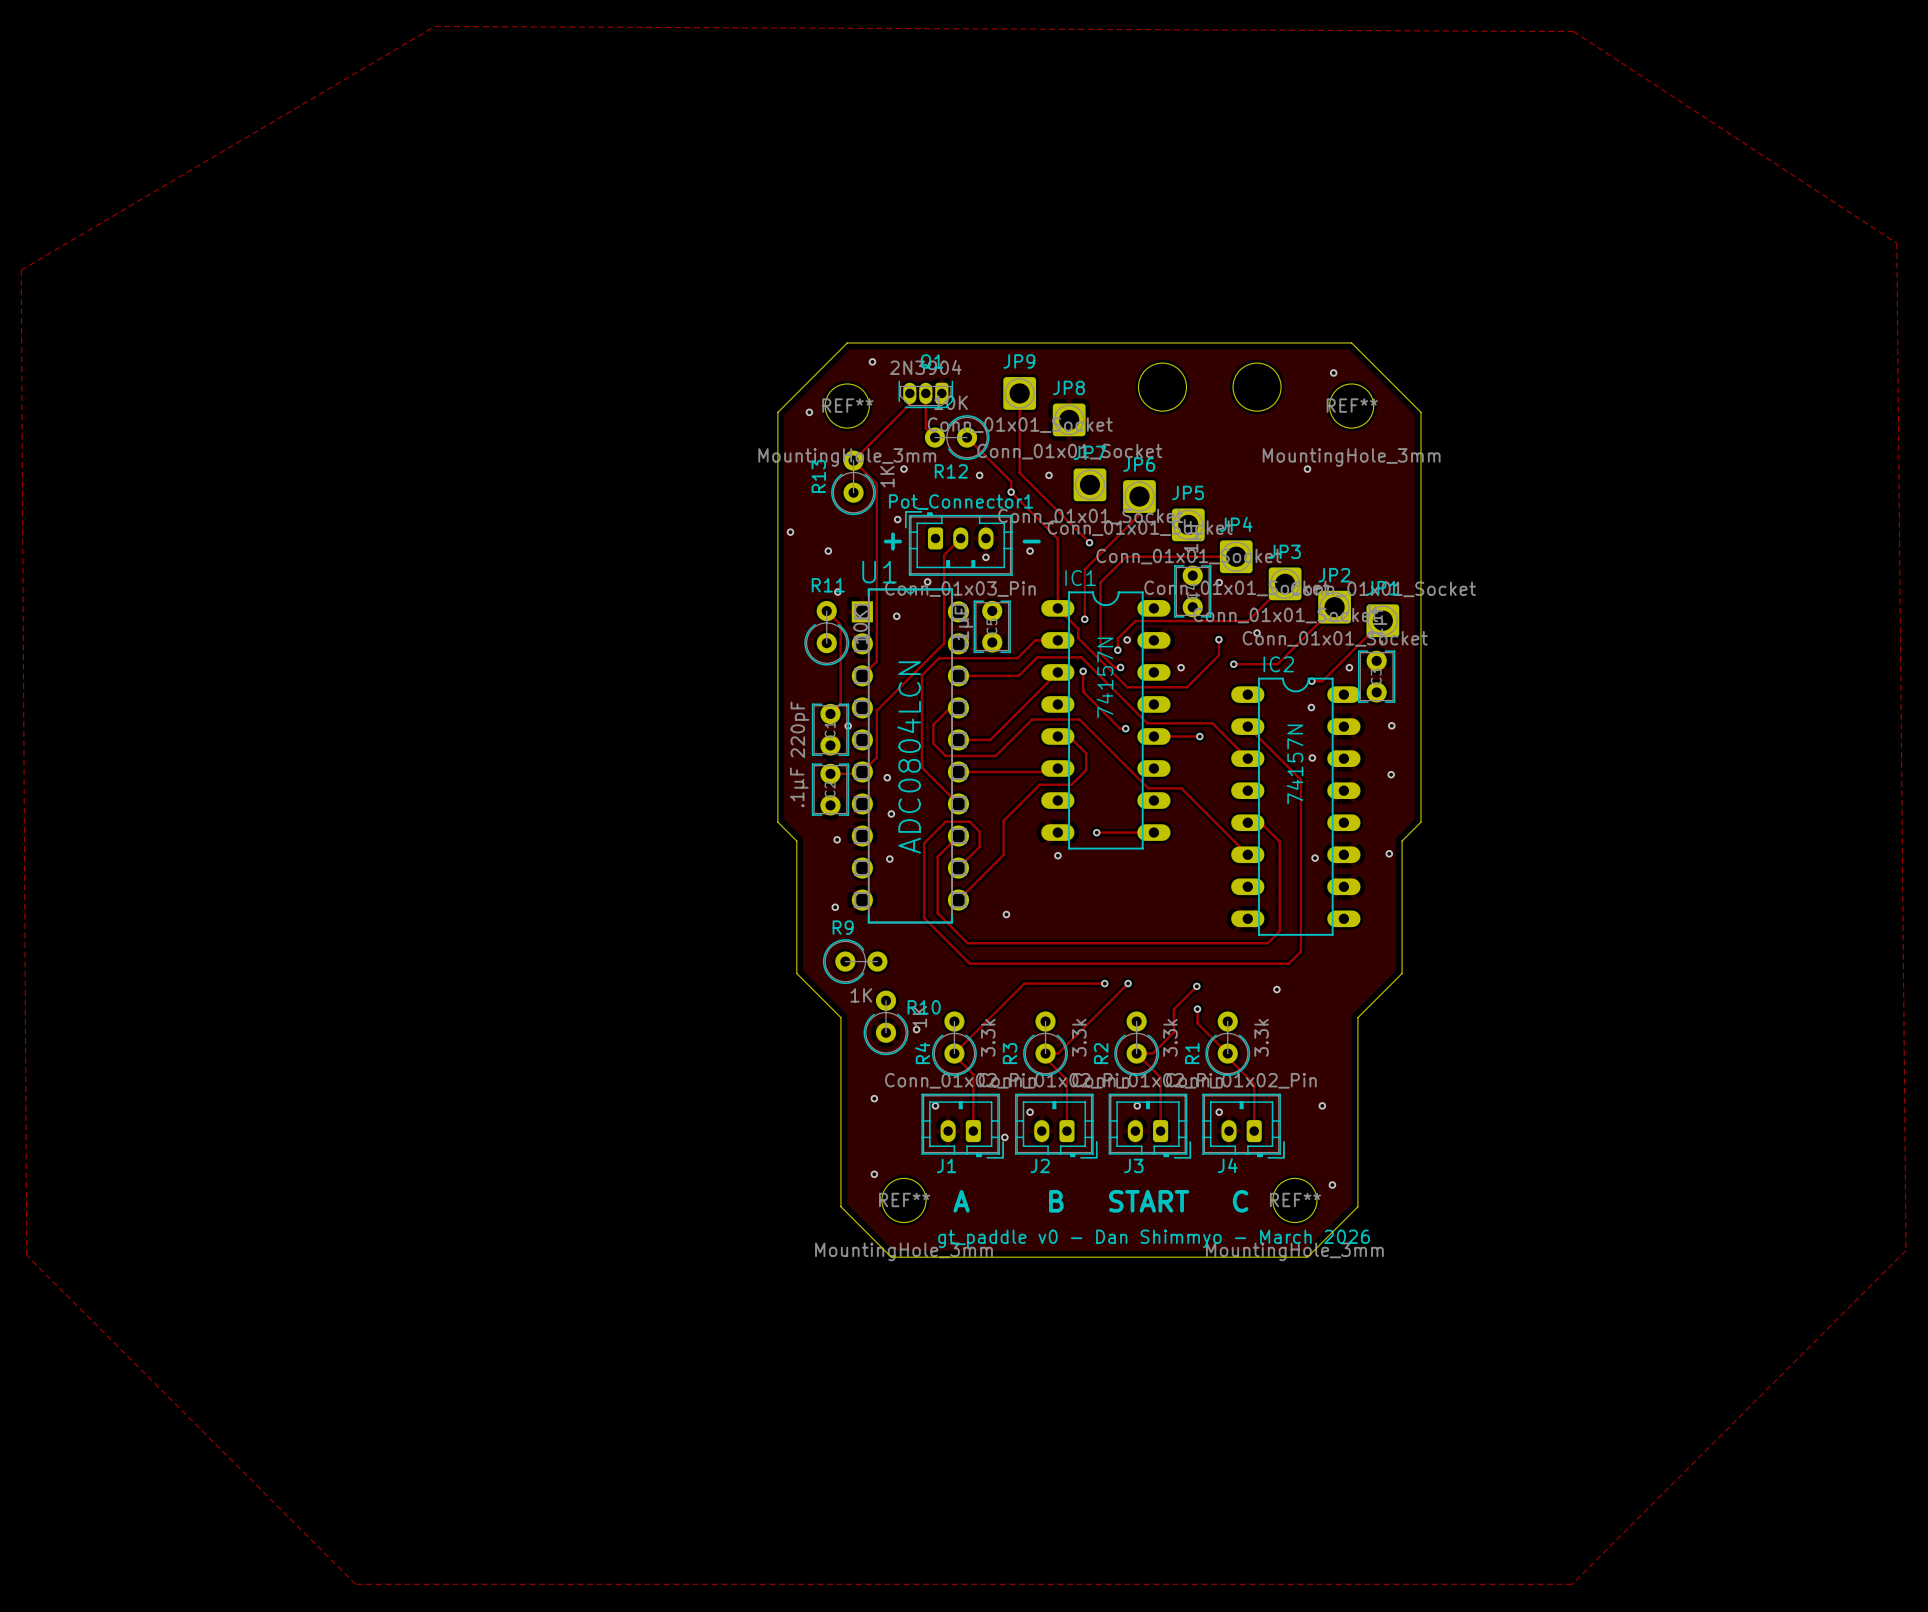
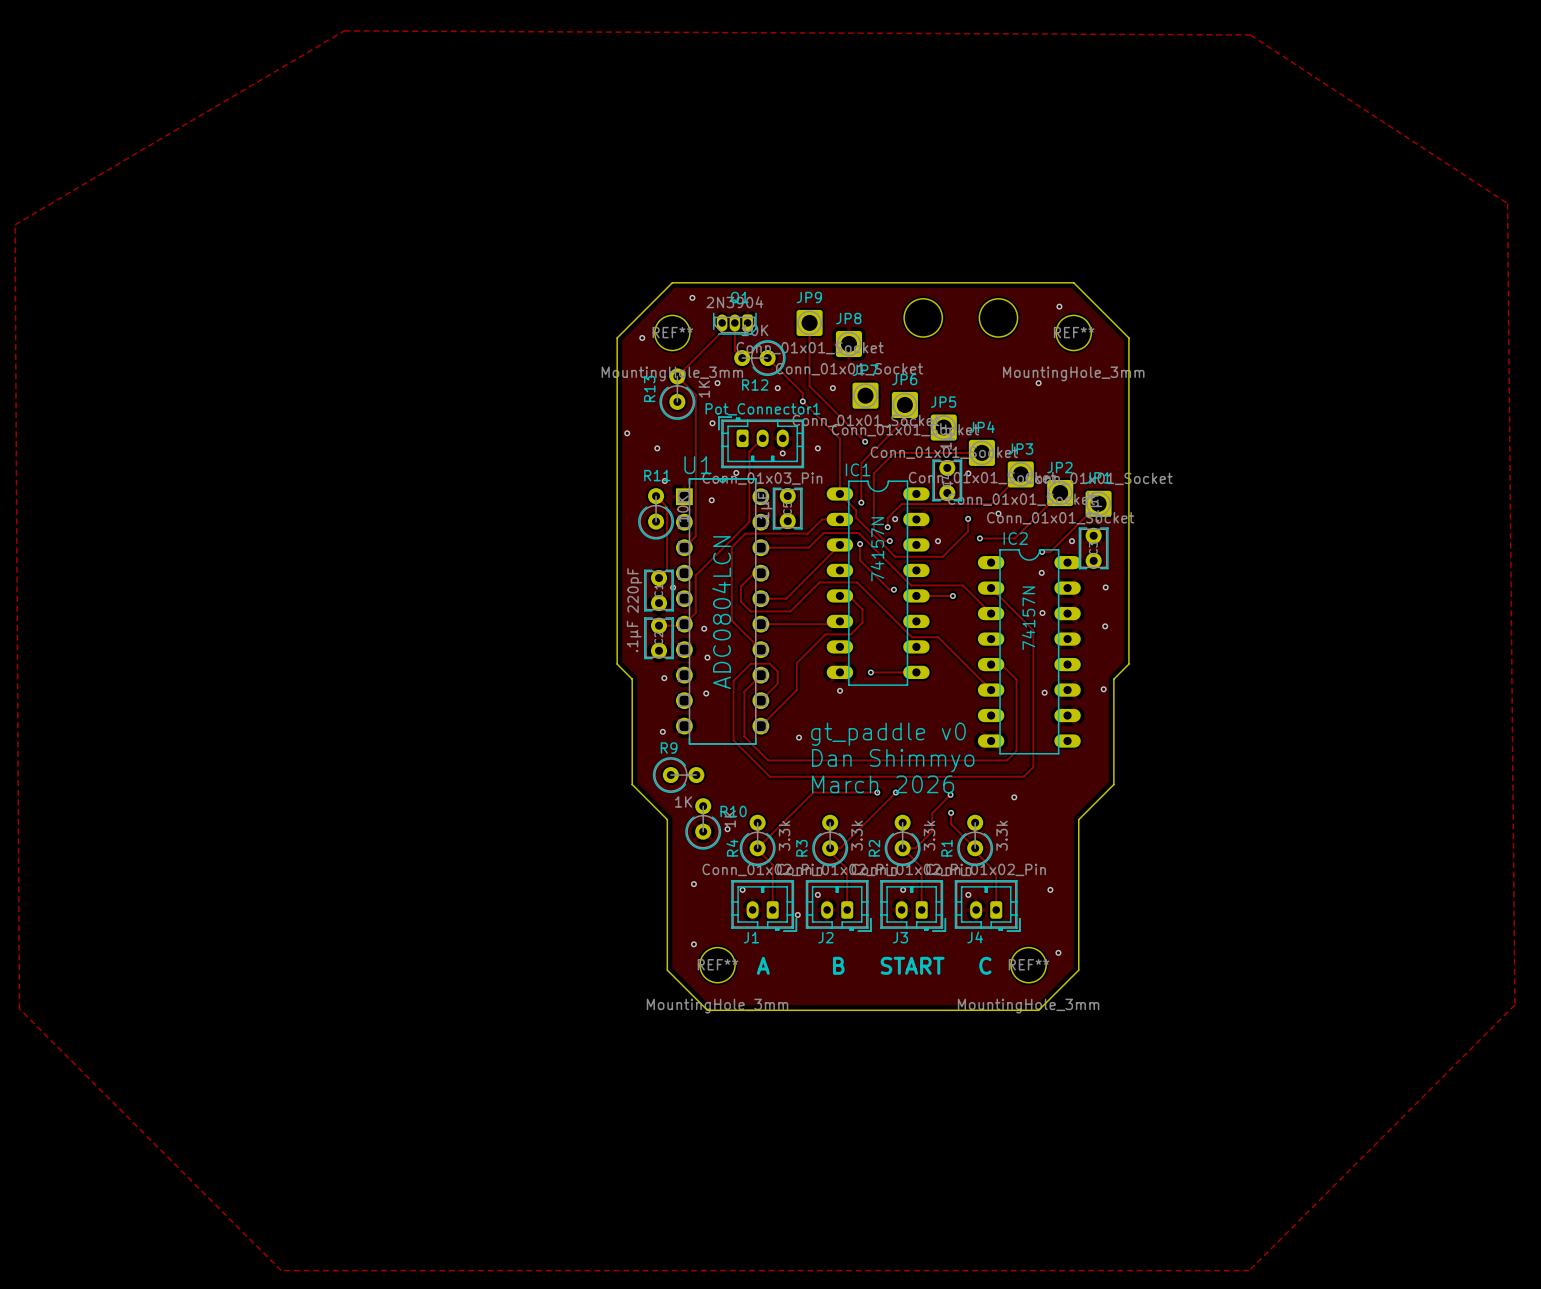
text: + (892, 541) -> none
text: - (1031, 541) -> none
text: none -> gt_paddle v0 (888, 734)
text: none -> Dan Shimmyo (893, 760)
text: none -> March 2026 (883, 784)
text: gt_paddle v0 - Dan Shimmyo - March 2026 (1154, 1238) -> none

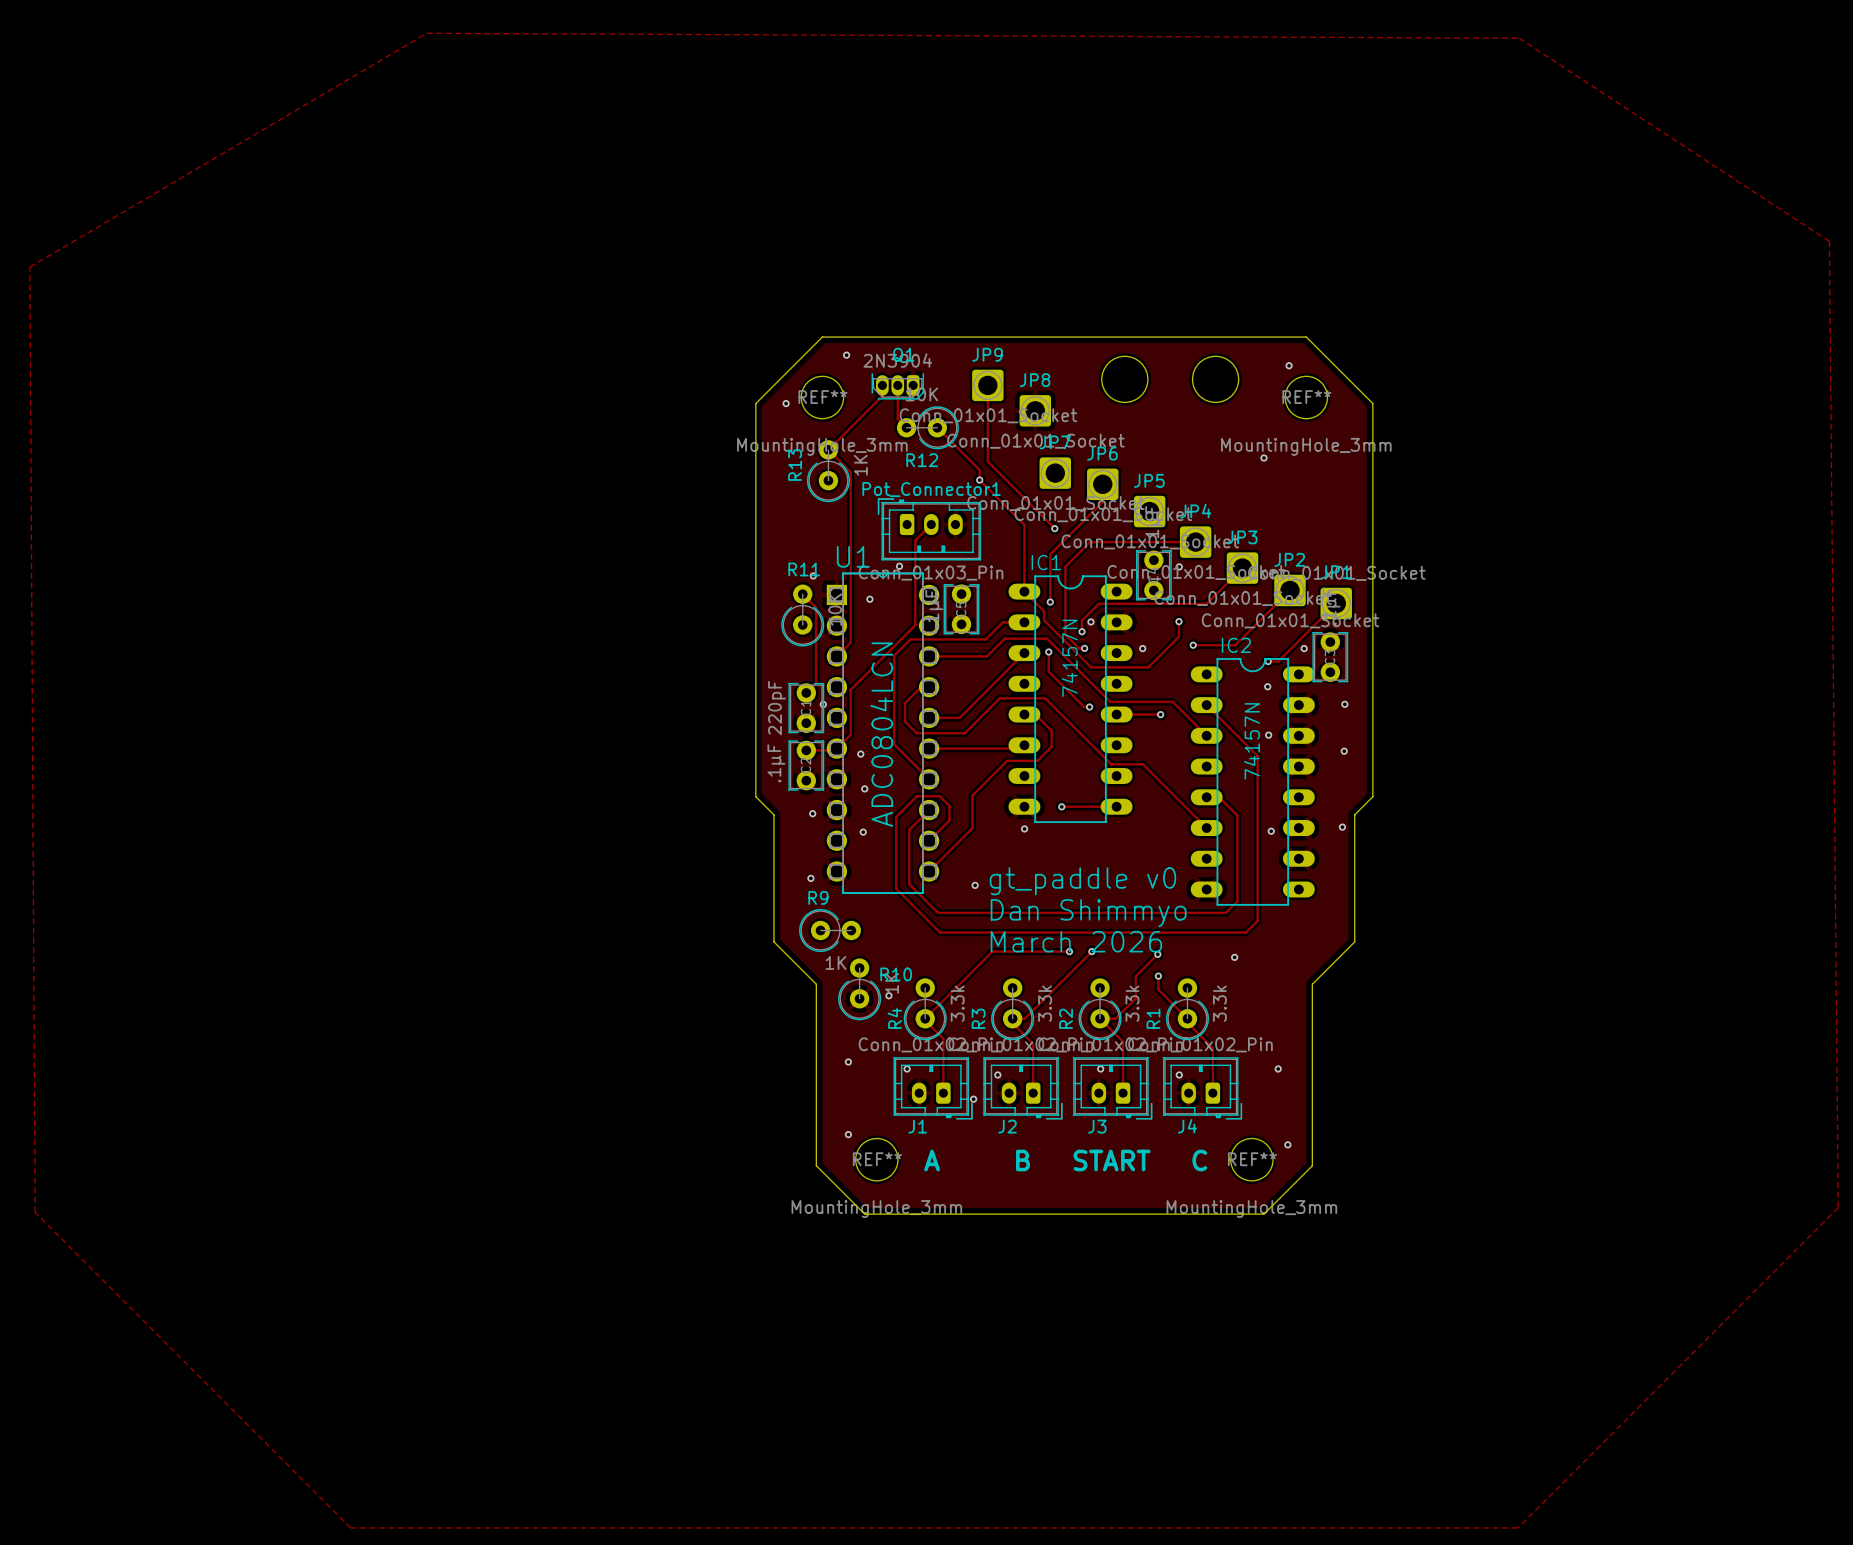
via: (717, 383) -> none
via: (777, 388) -> none
via: (832, 388) -> none
via: (712, 423) -> none
via: (627, 433) -> none
via: (657, 448) -> none
via: (817, 448) -> none
via: (782, 453) -> none
via: (998, 513) -> none

